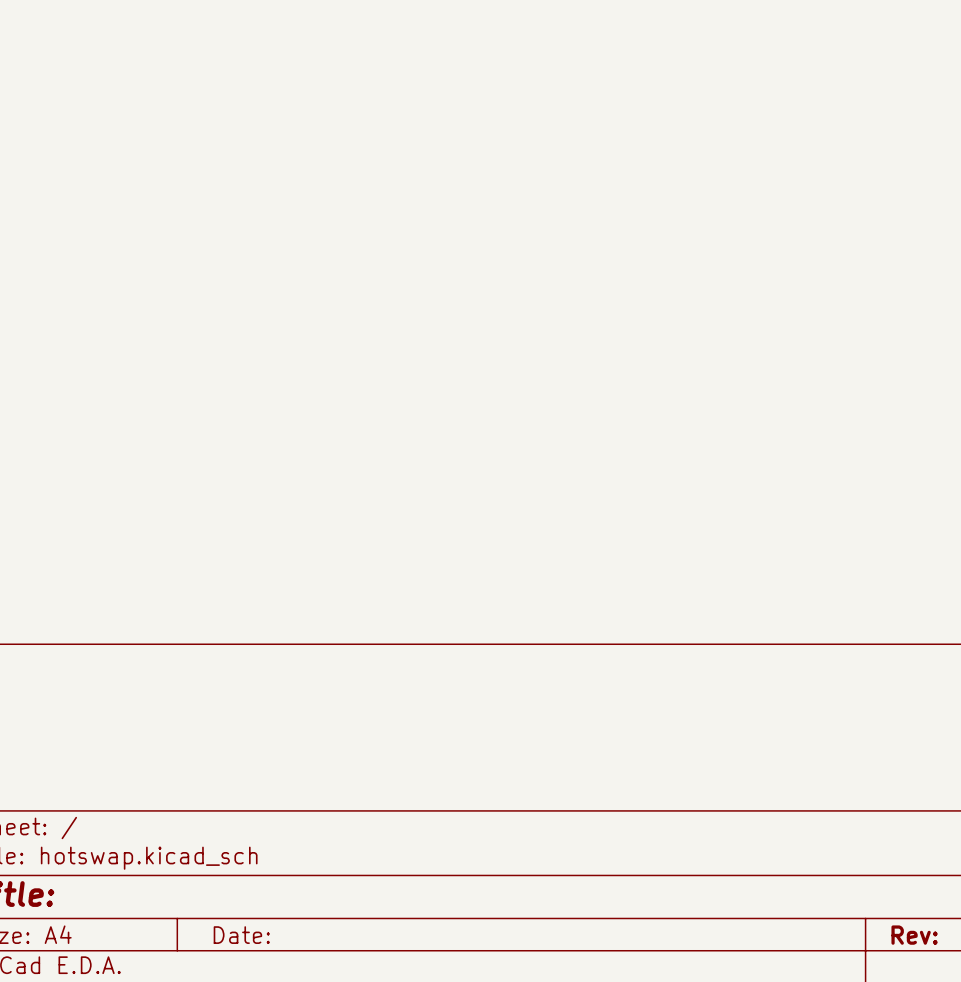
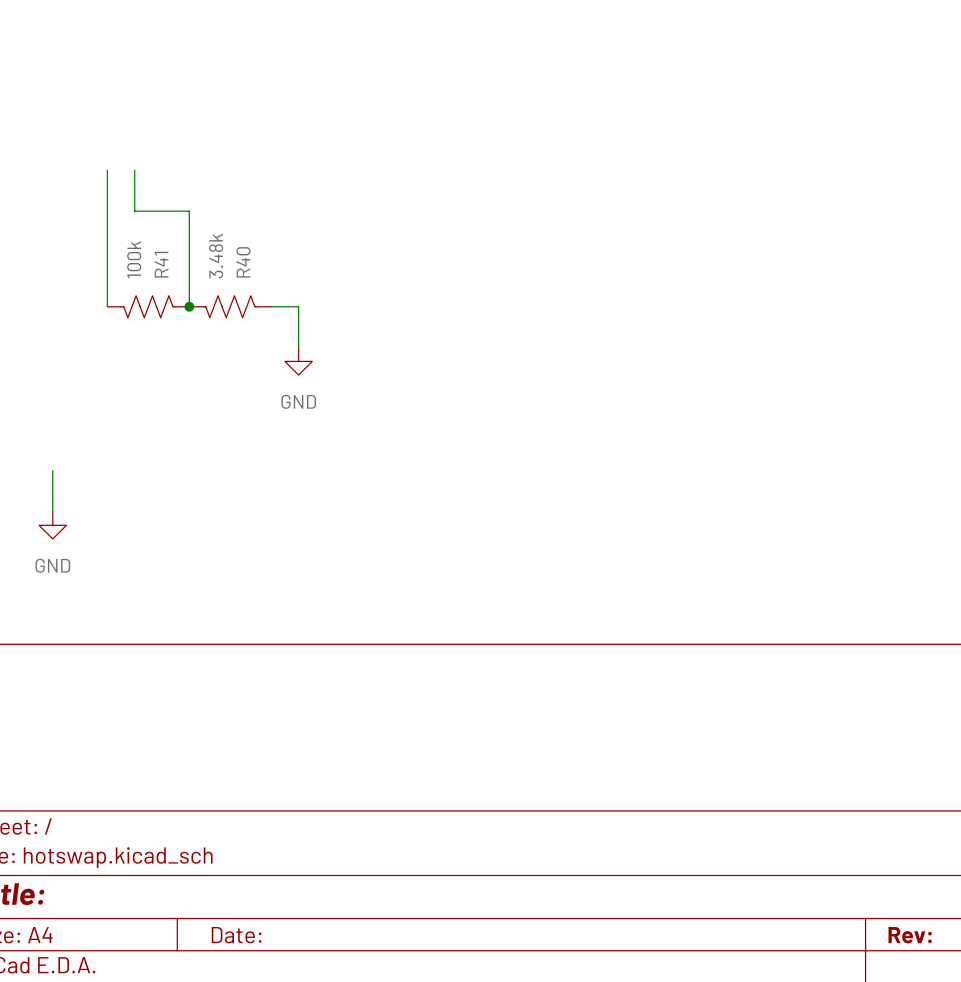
wire: none -> (107, 170) (107, 306)
wire: none -> (134, 170) (134, 211) (189, 211) (189, 306)
R41: none -> 100k (148, 306)
junction: none -> (189, 306)
R40: none -> 3.48k (230, 306)
wire: none -> (271, 306) (298, 306) (298, 347)
power symbol: none -> GND (298, 361)
wire: none -> (52, 470) (52, 511)
power symbol: none -> GND (52, 525)

